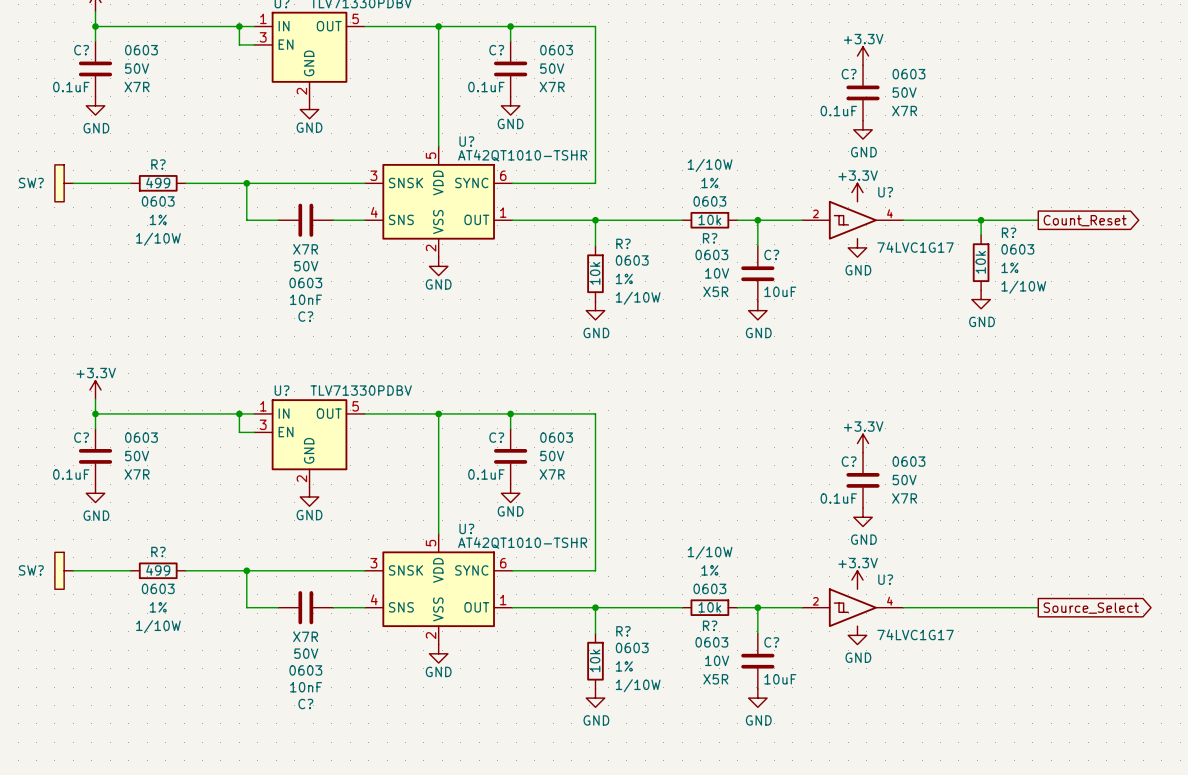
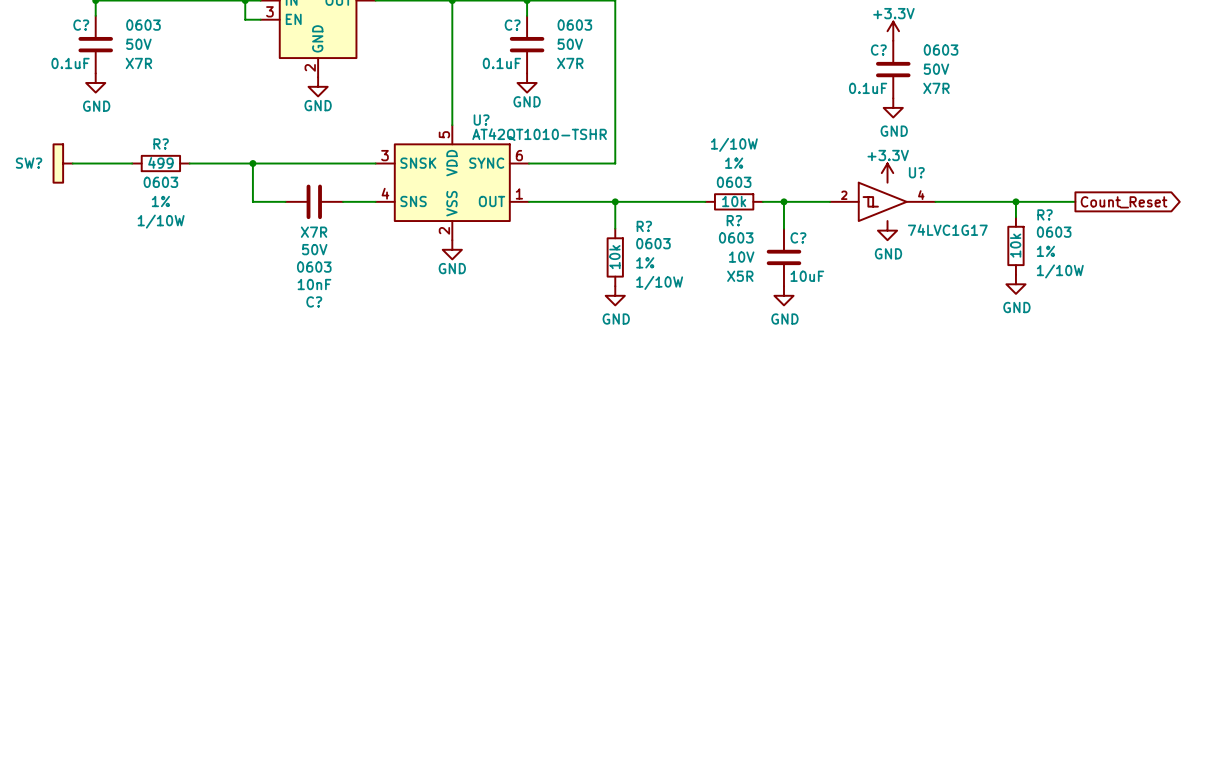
power symbol: +3.3V (95, 389) -> none
wire: (95, 399) (95, 428) -> none
wire: (95, 413) (254, 413) -> none
junction: (95, 413) -> none
wire: (239, 413) (239, 432) (254, 432) -> none
junction: (239, 413) -> none
wire: (364, 413) (595, 413) (595, 570) (512, 570) -> none
wire: (438, 413) (438, 533) -> none
junction: (438, 413) -> none
wire: (510, 413) (510, 428) -> none
junction: (510, 413) -> none
U?: TLV71330PDBV (309, 443) -> none
power symbol: +3.3V (863, 443) -> none
C?: 0.1uF (95, 456) -> none
C?: 0.1uF (510, 456) -> none
C?: 0.1uF (863, 480) -> none
power symbol: GND (95, 493) -> none
power symbol: GND (510, 493) -> none
power symbol: GND (309, 496) -> none
power symbol: GND (863, 517) -> none
SW?: (64, 570) -> none
wire: (73, 570) (130, 570) -> none
R?: 499 (158, 570) -> none
wire: (185, 570) (364, 570) -> none
wire: (246, 570) (246, 607) (278, 607) -> none
junction: (246, 570) -> none
power symbol: +3.3V (857, 580) -> none
U?: AT42QT1010-TSHR (438, 589) -> none
C?: 10nF (305, 607) -> none
wire: (333, 607) (364, 607) -> none
wire: (512, 607) (682, 607) -> none
wire: (595, 607) (595, 633) -> none
junction: (595, 607) -> none
R?: 10k (709, 607) -> none
wire: (737, 607) (802, 607) -> none
wire: (757, 607) (757, 633) -> none
junction: (757, 607) -> none
U?: 74LVC1G17 (852, 607) -> none
wire: (903, 607) (1038, 607) -> none
global label: Source_Select (1091, 608) -> none
power symbol: GND (857, 635) -> none
power symbol: GND (438, 653) -> none
R?: 10k (595, 661) -> none
C?: 10uF (757, 661) -> none
power symbol: GND (595, 698) -> none
power symbol: GND (757, 698) -> none

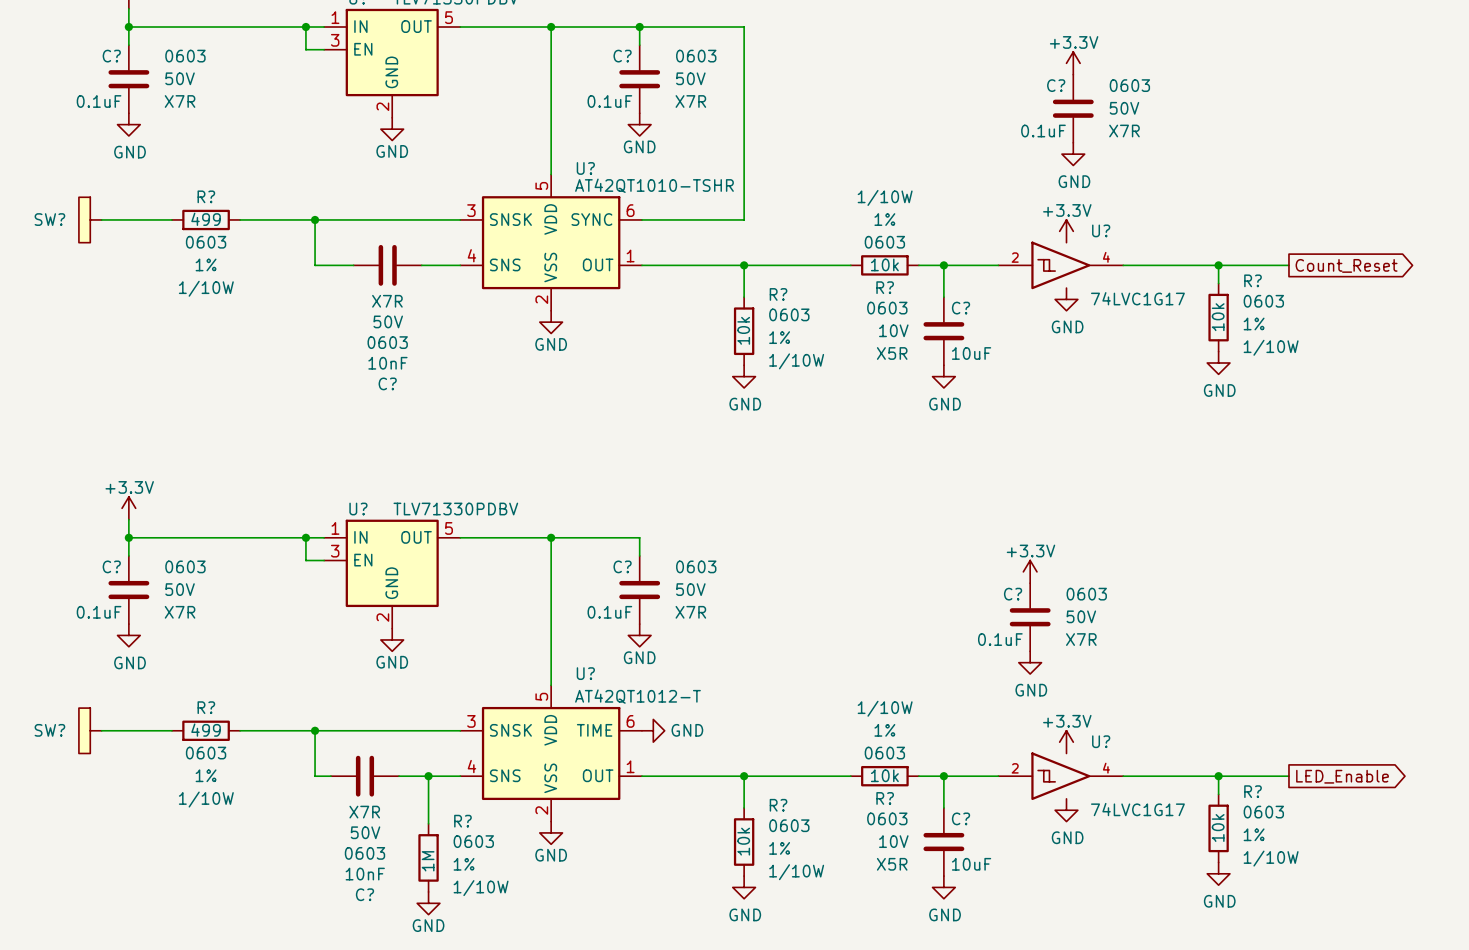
power symbol: none -> +3.3V (128, 508)
wire: none -> (128, 519) (128, 555)
wire: none -> (128, 537) (324, 537)
junction: none -> (128, 537)
wire: none -> (305, 537) (305, 560) (324, 560)
junction: none -> (305, 537)
wire: none -> (460, 537) (639, 537) (639, 555)
wire: none -> (551, 537) (551, 685)
junction: none -> (551, 537)
power symbol: none -> +3.3V (1030, 571)
U?: none -> TLV71330PDBV (392, 574)
C?: none -> 0.1uF (128, 590)
C?: none -> 0.1uF (639, 590)
C?: none -> 0.1uF (1030, 617)
power symbol: none -> GND (128, 635)
power symbol: none -> GND (639, 635)
power symbol: none -> GND (392, 639)
power symbol: none -> GND (1030, 662)
SW?: none -> (90, 730)
wire: none -> (101, 730) (172, 730)
R?: none -> 499 (206, 730)
wire: none -> (240, 730) (460, 730)
wire: none -> (315, 730) (315, 776) (330, 776)
junction: none -> (315, 730)
power symbol: none -> GND (653, 730)
power symbol: none -> +3.3V (1066, 742)
U?: none -> AT42QT1012-T (551, 753)
C?: none -> 10nF (364, 776)
wire: none -> (399, 776) (460, 776)
wire: none -> (428, 776) (428, 823)
junction: none -> (428, 776)
wire: none -> (641, 776) (850, 776)
wire: none -> (744, 776) (744, 807)
junction: none -> (744, 776)
R?: none -> 10k (884, 776)
wire: none -> (918, 776) (998, 776)
wire: none -> (943, 776) (943, 807)
junction: none -> (943, 776)
U?: none -> 74LVC1G17 (1060, 776)
wire: none -> (1123, 776) (1288, 776)
wire: none -> (1218, 776) (1218, 794)
junction: none -> (1218, 776)
global label: none -> LED_Enable (1342, 776)
power symbol: none -> GND (1066, 810)
R?: none -> 10k (1218, 828)
power symbol: none -> GND (551, 832)
R?: none -> 10k (744, 842)
C?: none -> 10uF (943, 842)
R?: none -> 1M (428, 857)
power symbol: none -> GND (1218, 873)
power symbol: none -> GND (744, 887)
power symbol: none -> GND (943, 887)
power symbol: none -> GND (428, 903)

